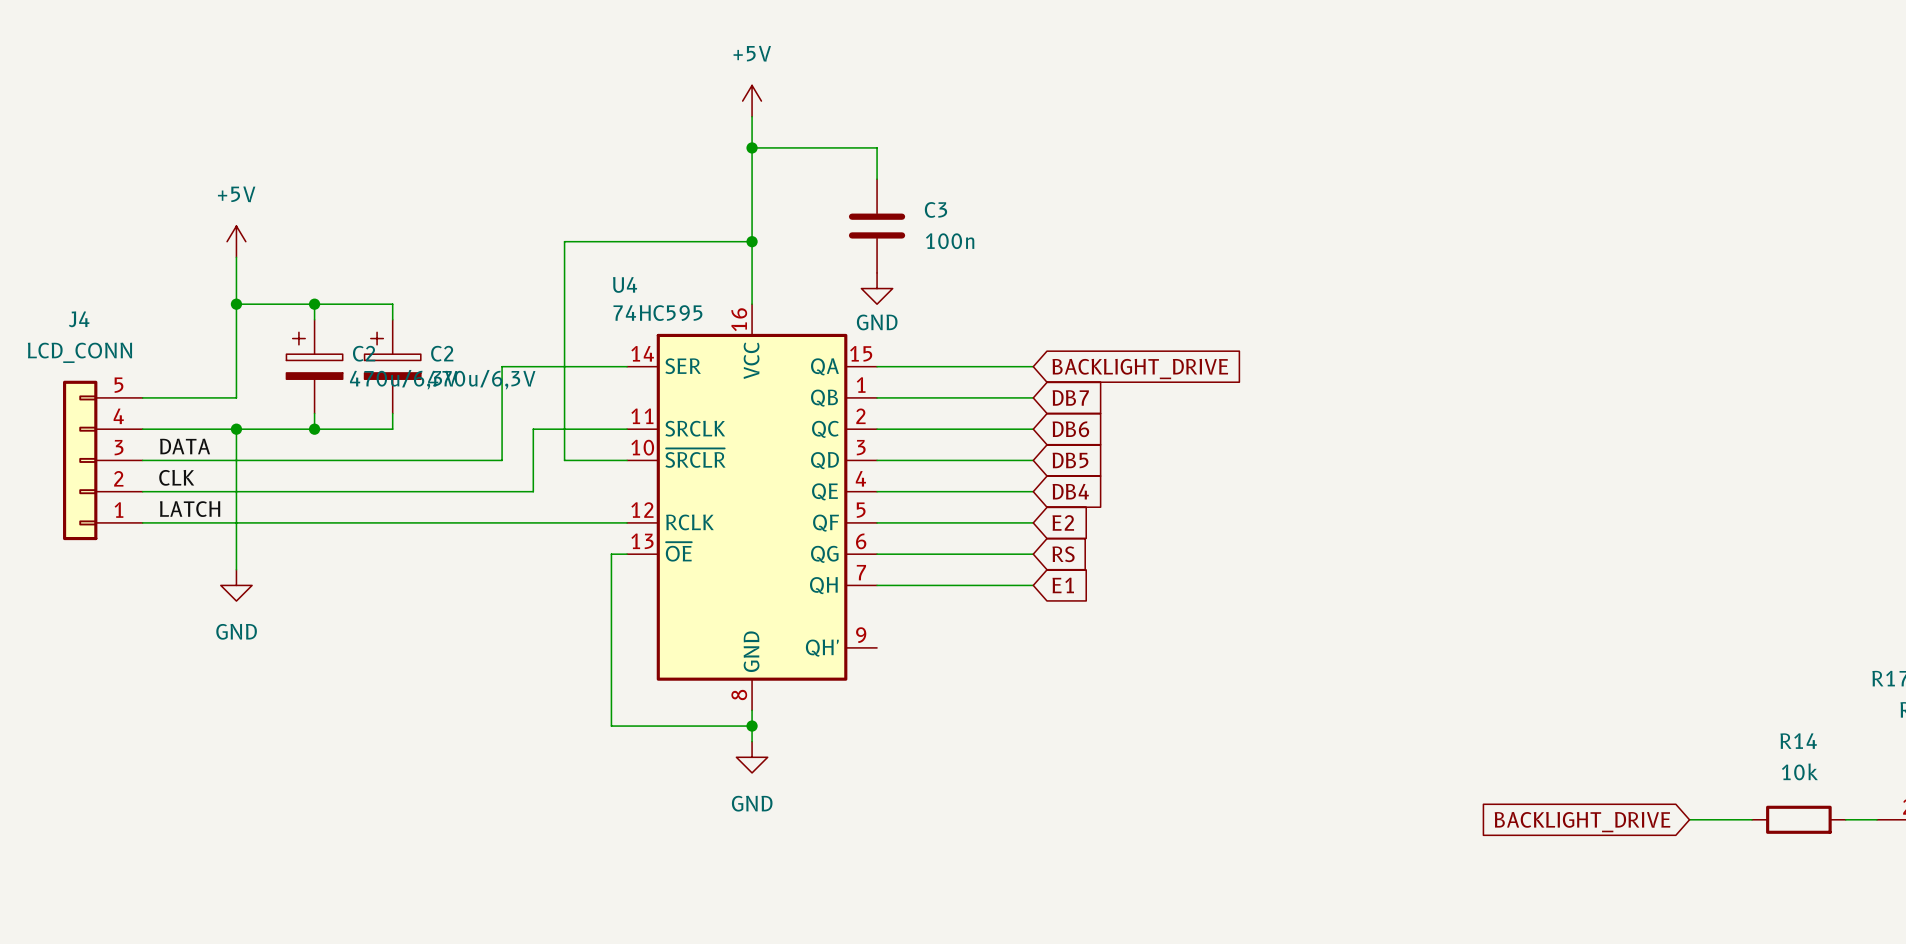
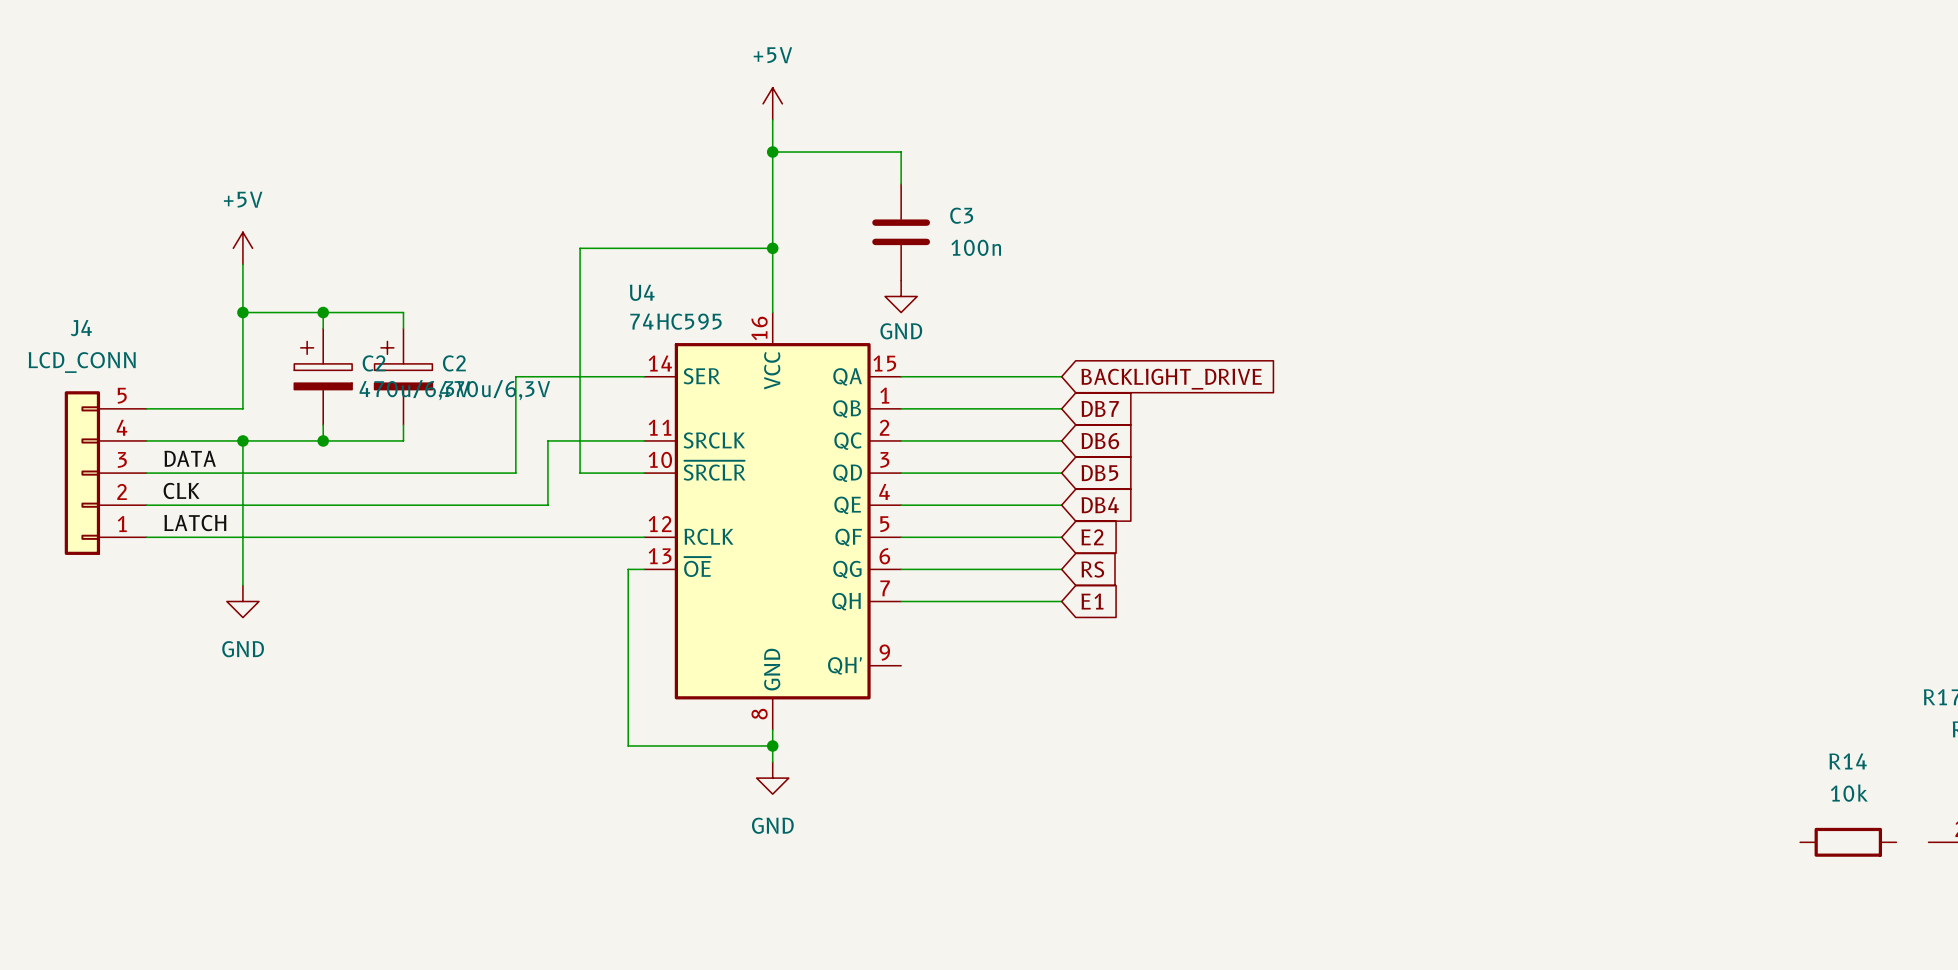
wire: (1689, 819) (1752, 819) -> none
wire: (1845, 819) (1877, 819) -> none
global label: BACKLIGHT_DRIVE (1582, 822) -> none

